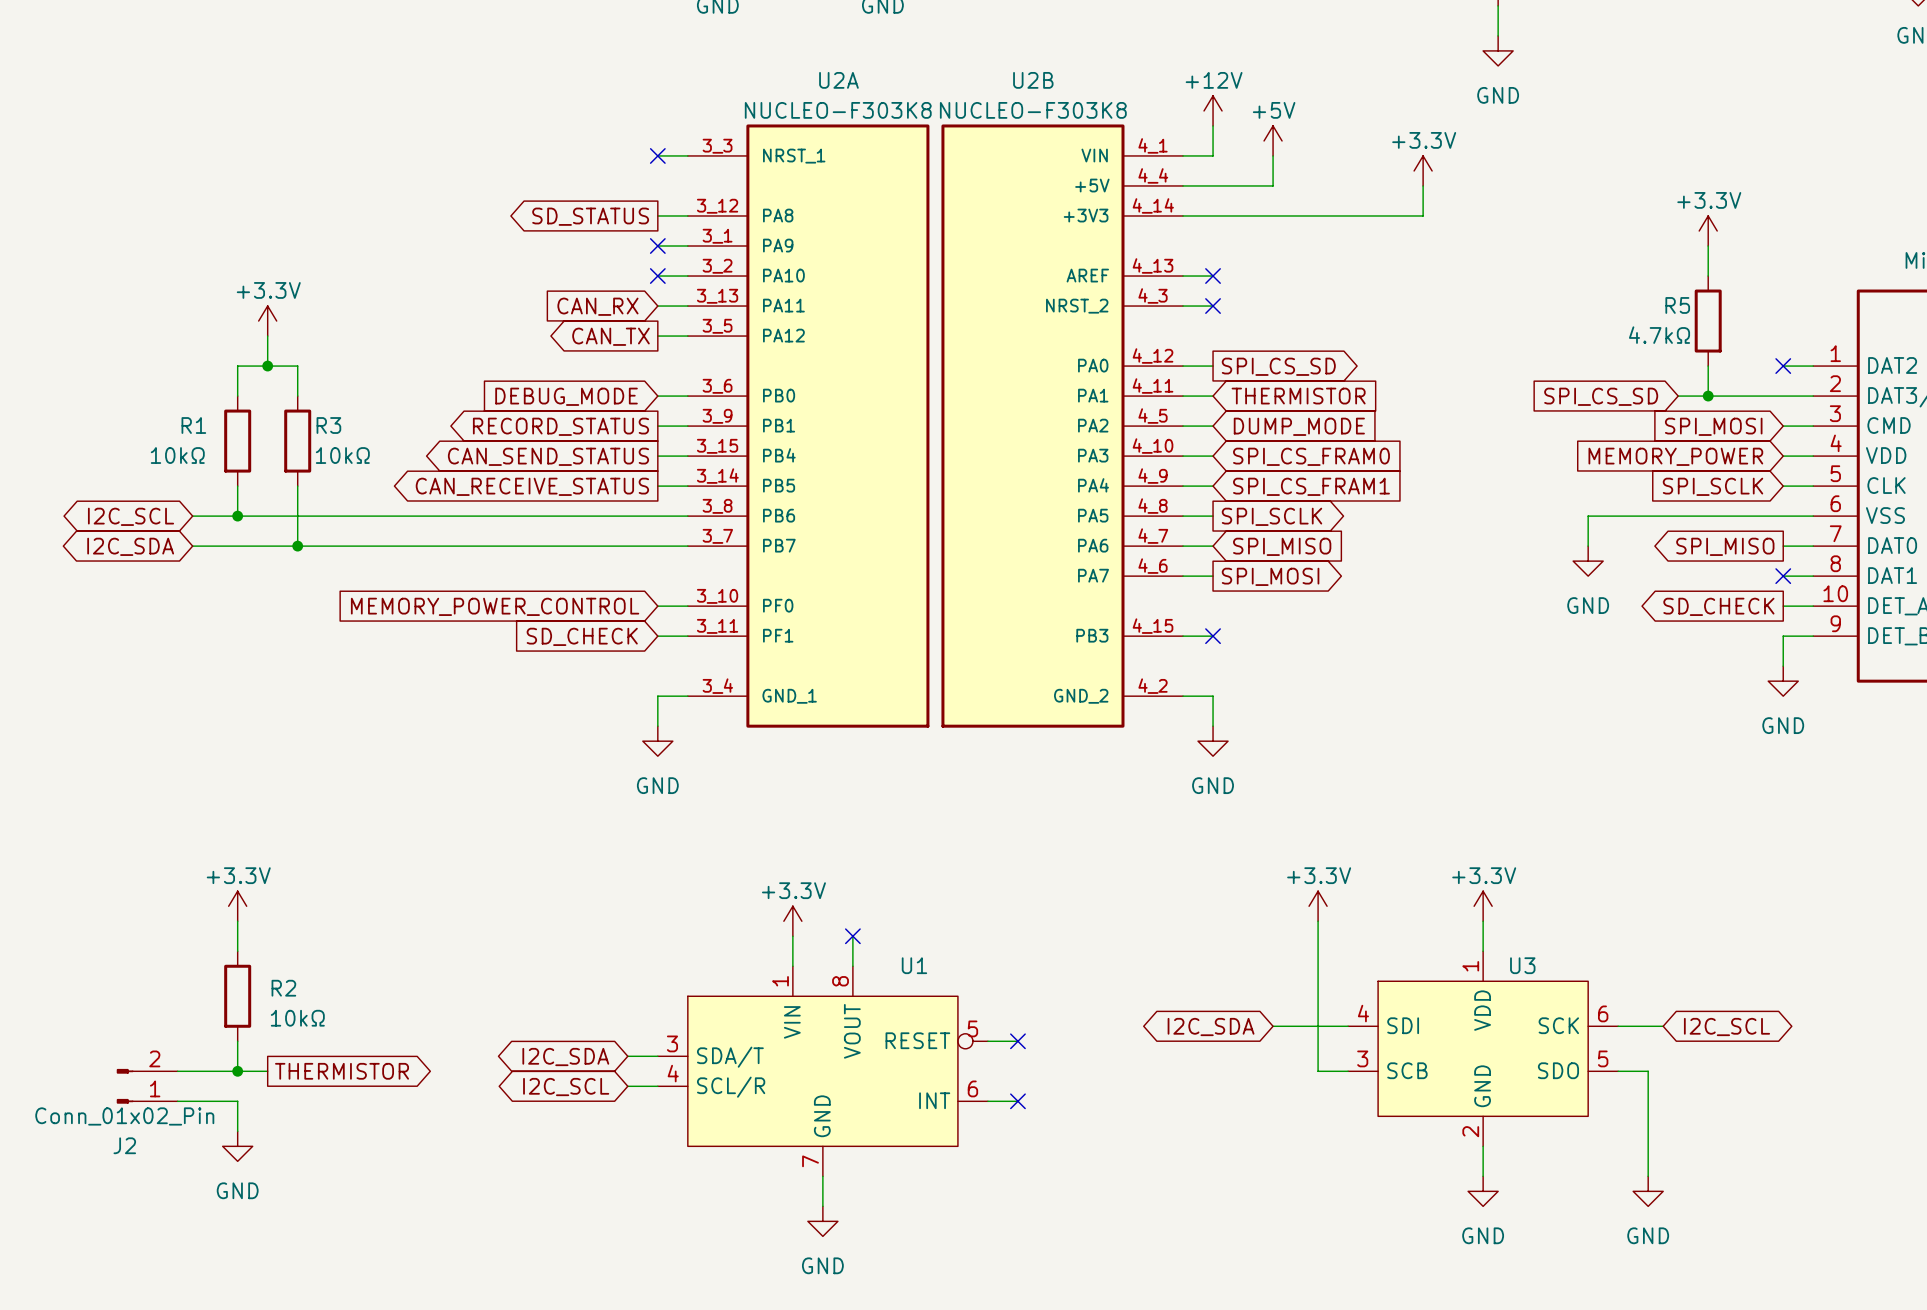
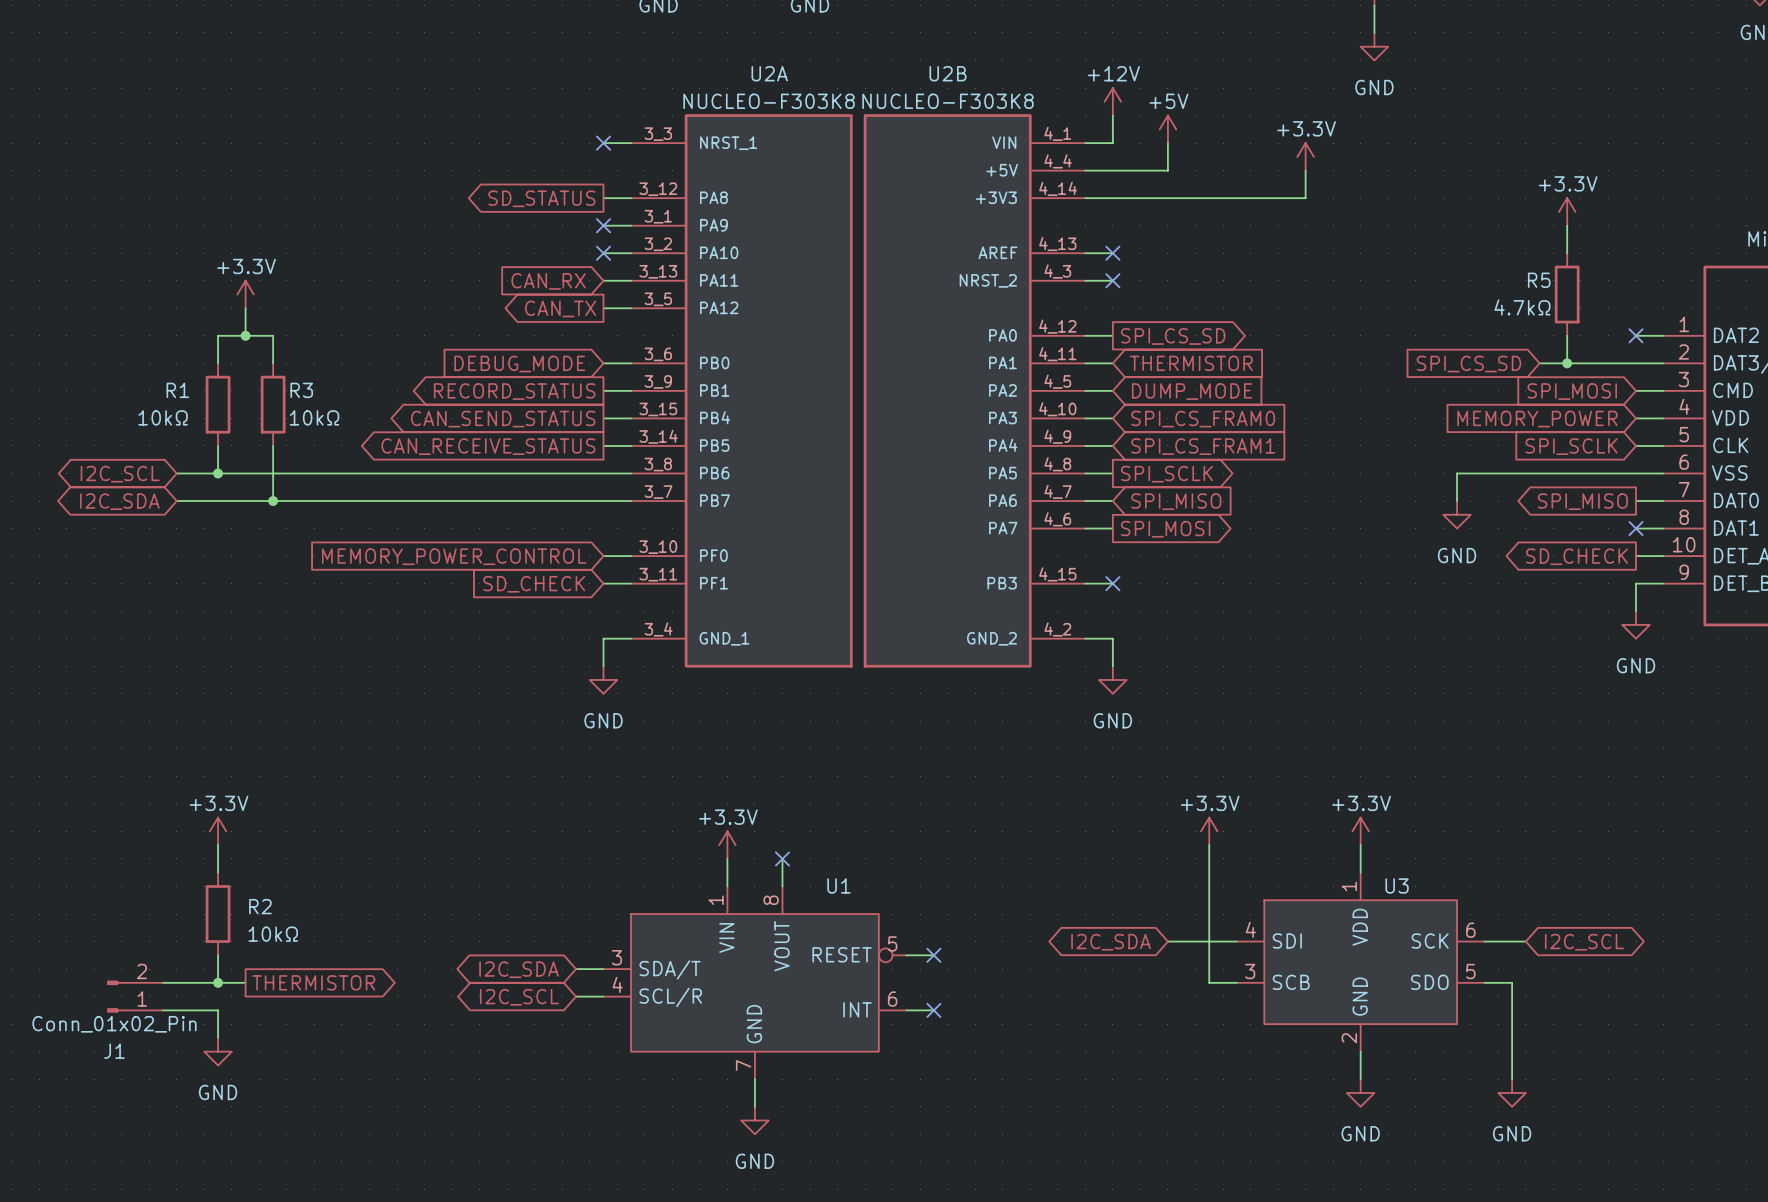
J2 name: J2 (124, 1145) -> J1 (114, 1051)

